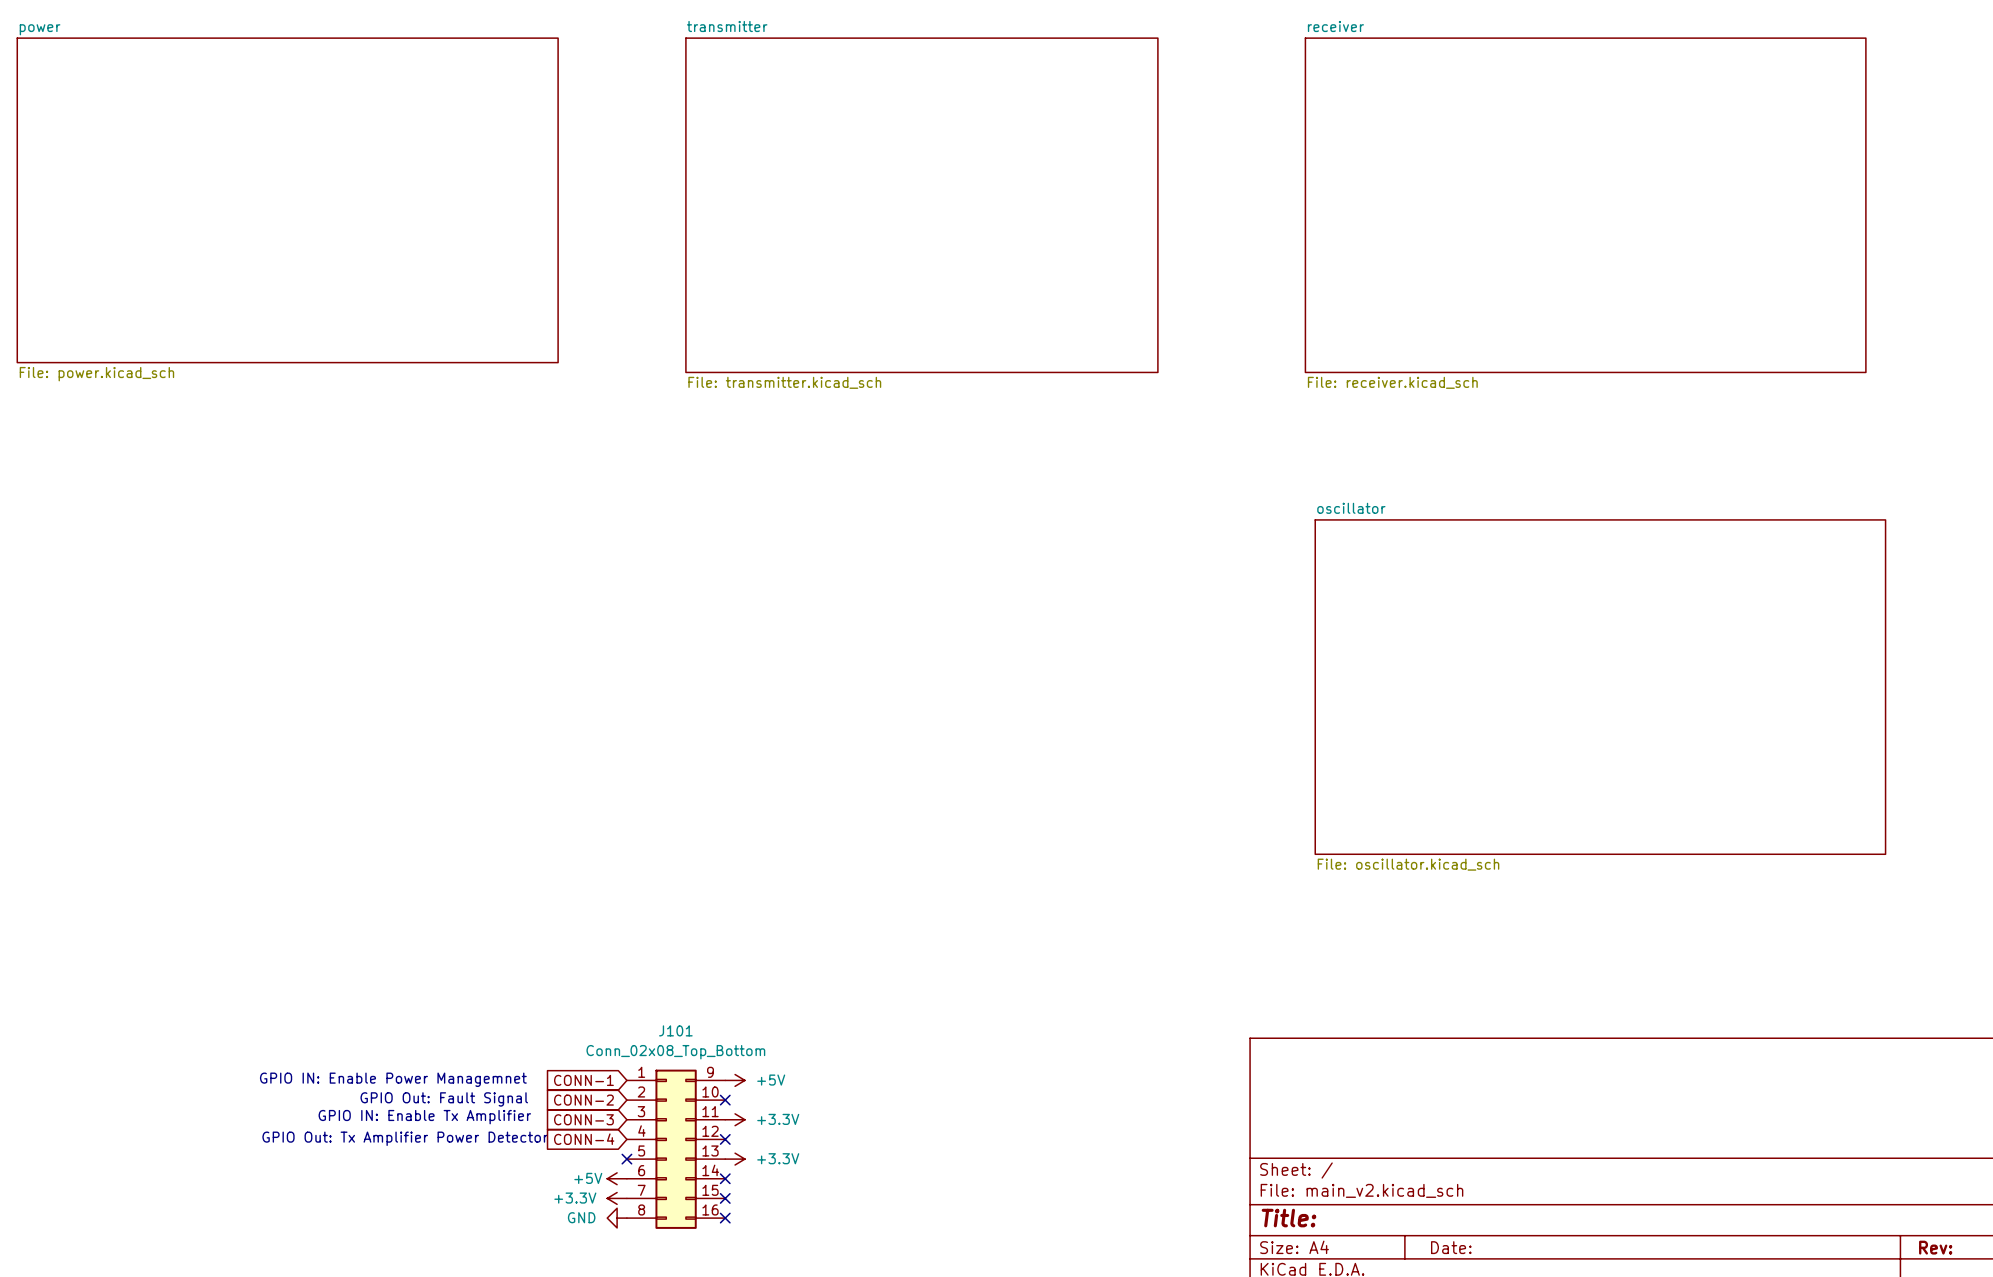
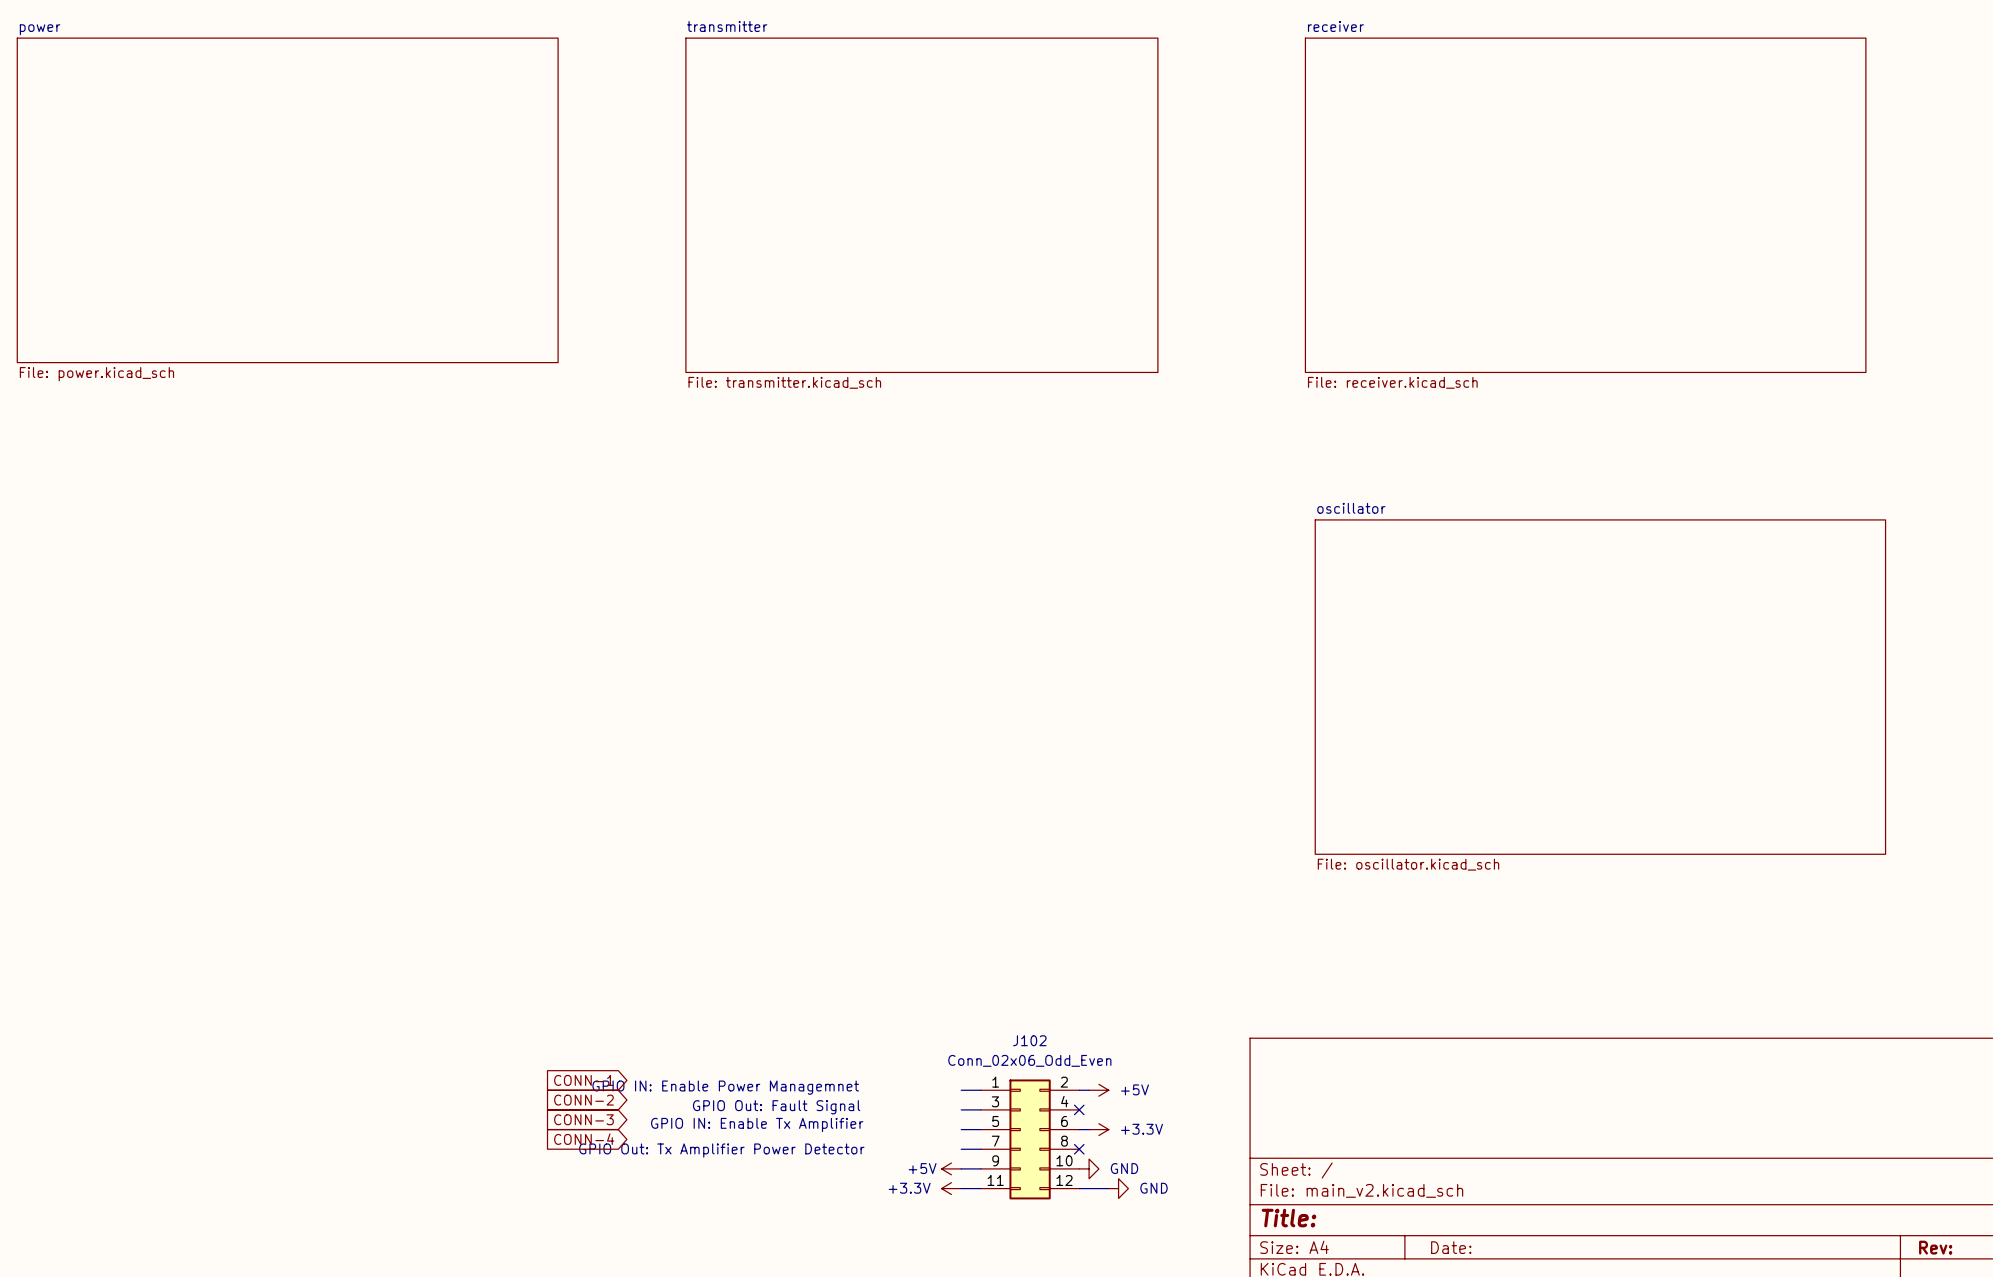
text: GPIO IN: Enable Power Managemnet (393, 1079) -> none
power symbol: +5V (735, 1080) -> none
text: none -> GPIO IN: Enable Power Managemnet (725, 1087)
wire: none -> (961, 1090) (980, 1090)
wire: none -> (1079, 1090) (1089, 1090)
power symbol: none -> +5V (1098, 1090)
text: GPIO Out: Fault Signal (444, 1099) -> none
no-connect mark: (725, 1100) -> none
text: none -> GPIO Out: Fault Signal (776, 1107)
wire: none -> (961, 1109) (980, 1109)
no-connect mark: none -> (1079, 1109)
text: GPIO IN: Enable Tx Amplifier (424, 1117) -> none
power symbol: +3.3V (735, 1119) -> none
text: none -> GPIO IN: Enable Tx Amplifier (757, 1125)
wire: none -> (961, 1129) (980, 1129)
wire: none -> (1079, 1129) (1089, 1129)
power symbol: none -> +3.3V (1098, 1129)
text: GPIO Out: Tx Amplifier Power Detector (405, 1138) -> none
no-connect mark: (725, 1139) -> none
J102: none -> Conn_02x06_Odd_Even (1030, 1139)
J101: Conn_02x08_Top_Bottom (676, 1149) -> none
wire: none -> (961, 1149) (980, 1149)
no-connect mark: none -> (1079, 1149)
text: none -> GPIO Out: Tx Amplifier Power Detector (721, 1150)
no-connect mark: (626, 1159) -> none
power symbol: +3.3V (735, 1159) -> none
power symbol: none -> +5V (951, 1168)
wire: none -> (961, 1168) (980, 1168)
power symbol: none -> GND (1089, 1168)
power symbol: +5V (617, 1178) -> none
no-connect mark: (725, 1178) -> none
power symbol: none -> +3.3V (951, 1188)
wire: none -> (961, 1188) (980, 1188)
wire: none -> (1079, 1188) (1108, 1188)
power symbol: none -> GND (1118, 1188)
power symbol: +3.3V (617, 1198) -> none
no-connect mark: (725, 1198) -> none
power symbol: GND (617, 1218) -> none
no-connect mark: (725, 1218) -> none

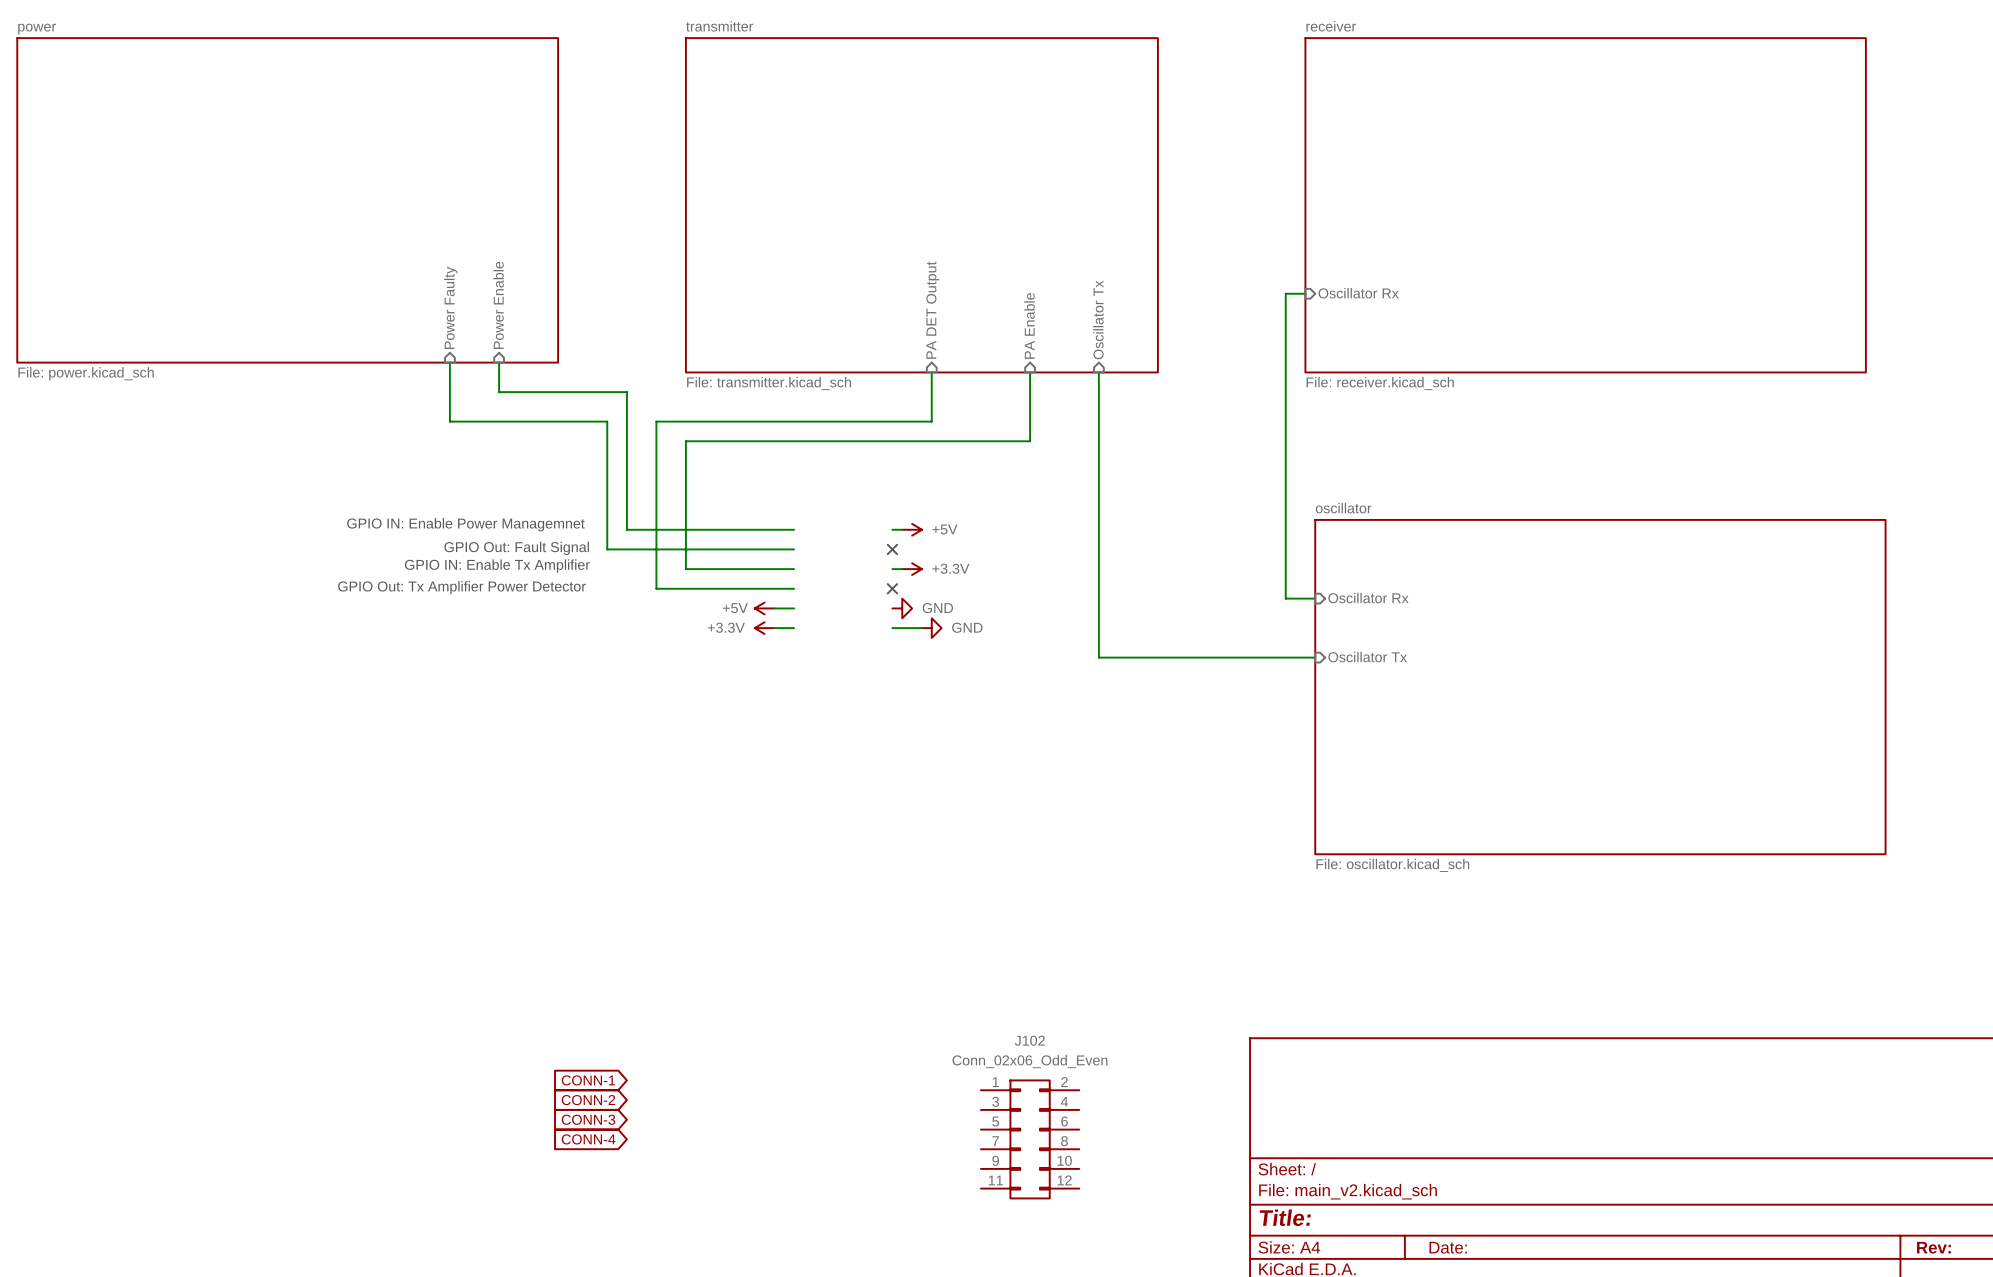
wire: none -> (1305, 293) (1285, 293) (1285, 598) (1315, 598)
sheet pin: none -> Oscillator Rx (1358, 293)
sheet pin: none -> Power Enable (498, 305)
sheet pin: none -> Power Faulty (450, 307)
sheet pin: none -> PA DET Output (932, 310)
sheet pin: none -> Oscillator Tx (1098, 319)
sheet pin: none -> PA Enable (1029, 325)
wire: none -> (449, 362) (449, 421) (607, 421) (607, 549) (794, 549)
wire: none -> (499, 362) (499, 392) (626, 392) (626, 529) (794, 529)
wire: none -> (931, 372) (931, 421) (656, 421) (656, 588) (794, 588)
wire: none -> (1030, 372) (1030, 441) (685, 441) (685, 569) (794, 569)
wire: none -> (1098, 372) (1098, 657) (1315, 657)
text: none -> GPIO IN: Enable Power Managemnet (465, 524)
wire: none -> (892, 529) (902, 529)
power symbol: none -> +5V (912, 529)
text: none -> GPIO Out: Fault Signal (516, 548)
no-connect mark: none -> (892, 549)
text: none -> GPIO IN: Enable Tx Amplifier (497, 566)
wire: none -> (892, 569) (902, 569)
power symbol: none -> +3.3V (912, 569)
text: none -> GPIO Out: Tx Amplifier Power Detector (461, 587)
no-connect mark: none -> (892, 588)
sheet pin: none -> Oscillator Rx (1368, 598)
power symbol: none -> +5V (764, 608)
wire: none -> (774, 608) (794, 608)
power symbol: none -> GND (902, 608)
power symbol: none -> +3.3V (764, 628)
wire: none -> (774, 628) (794, 628)
wire: none -> (892, 628) (921, 628)
power symbol: none -> GND (931, 628)
sheet pin: none -> Oscillator Tx (1367, 657)
text: GPIO IN: Enable Power Managemnet (725, 1087) -> none
wire: (961, 1090) (980, 1090) -> none
wire: (1079, 1090) (1089, 1090) -> none
power symbol: +5V (1098, 1090) -> none
text: GPIO Out: Fault Signal (776, 1107) -> none
wire: (961, 1109) (980, 1109) -> none
no-connect mark: (1079, 1109) -> none
text: GPIO IN: Enable Tx Amplifier (757, 1125) -> none
wire: (961, 1129) (980, 1129) -> none
wire: (1079, 1129) (1089, 1129) -> none
power symbol: +3.3V (1098, 1129) -> none
wire: (961, 1149) (980, 1149) -> none
no-connect mark: (1079, 1149) -> none
text: GPIO Out: Tx Amplifier Power Detector (721, 1150) -> none
power symbol: +5V (951, 1168) -> none
wire: (961, 1168) (980, 1168) -> none
power symbol: GND (1089, 1168) -> none
power symbol: +3.3V (951, 1188) -> none
wire: (961, 1188) (980, 1188) -> none
wire: (1079, 1188) (1108, 1188) -> none
power symbol: GND (1118, 1188) -> none

